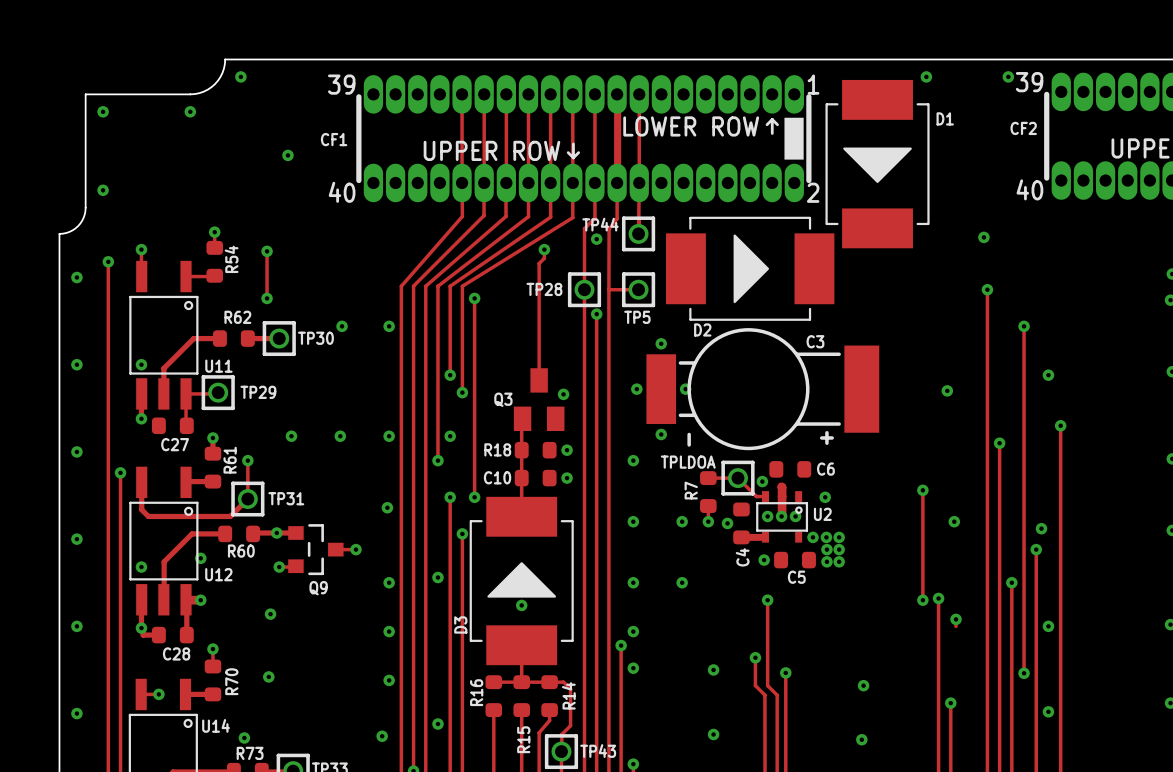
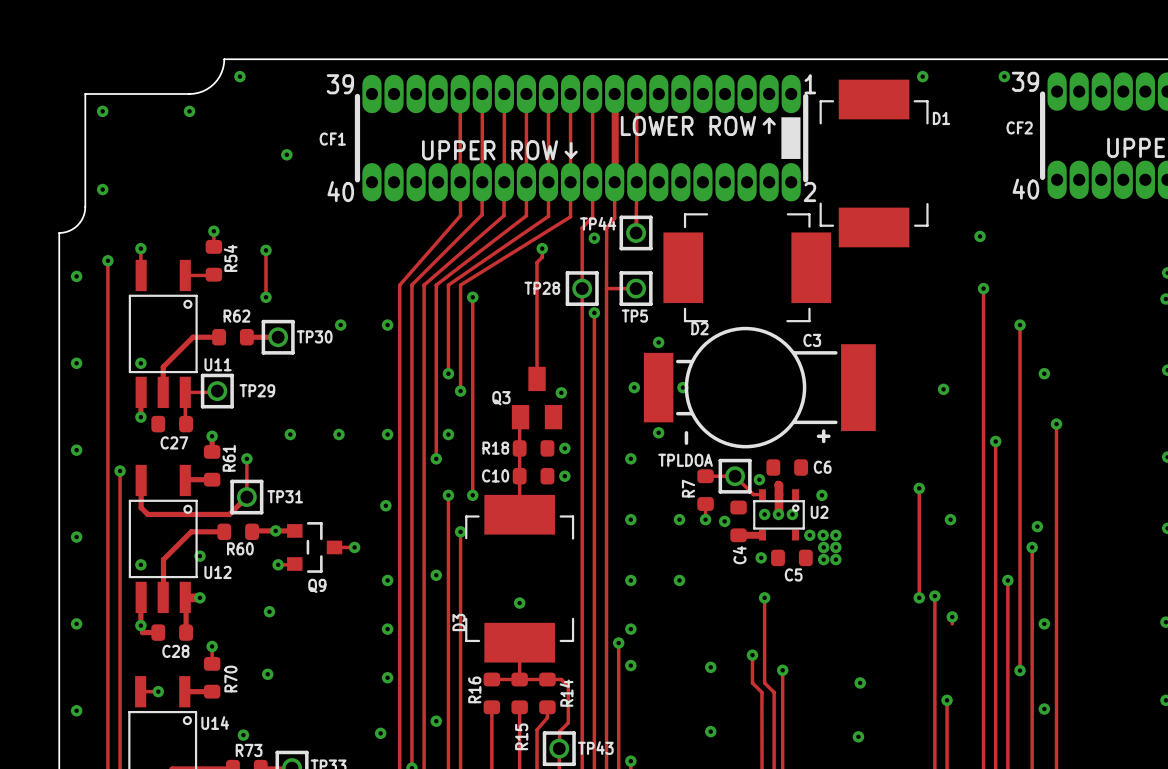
D1 footprint: [825, 79, 930, 249] -> [819, 79, 929, 248]
D2 footprint: [666, 216, 835, 321] -> [663, 213, 832, 323]
D3 footprint: [469, 496, 574, 666] -> [465, 494, 575, 663]

